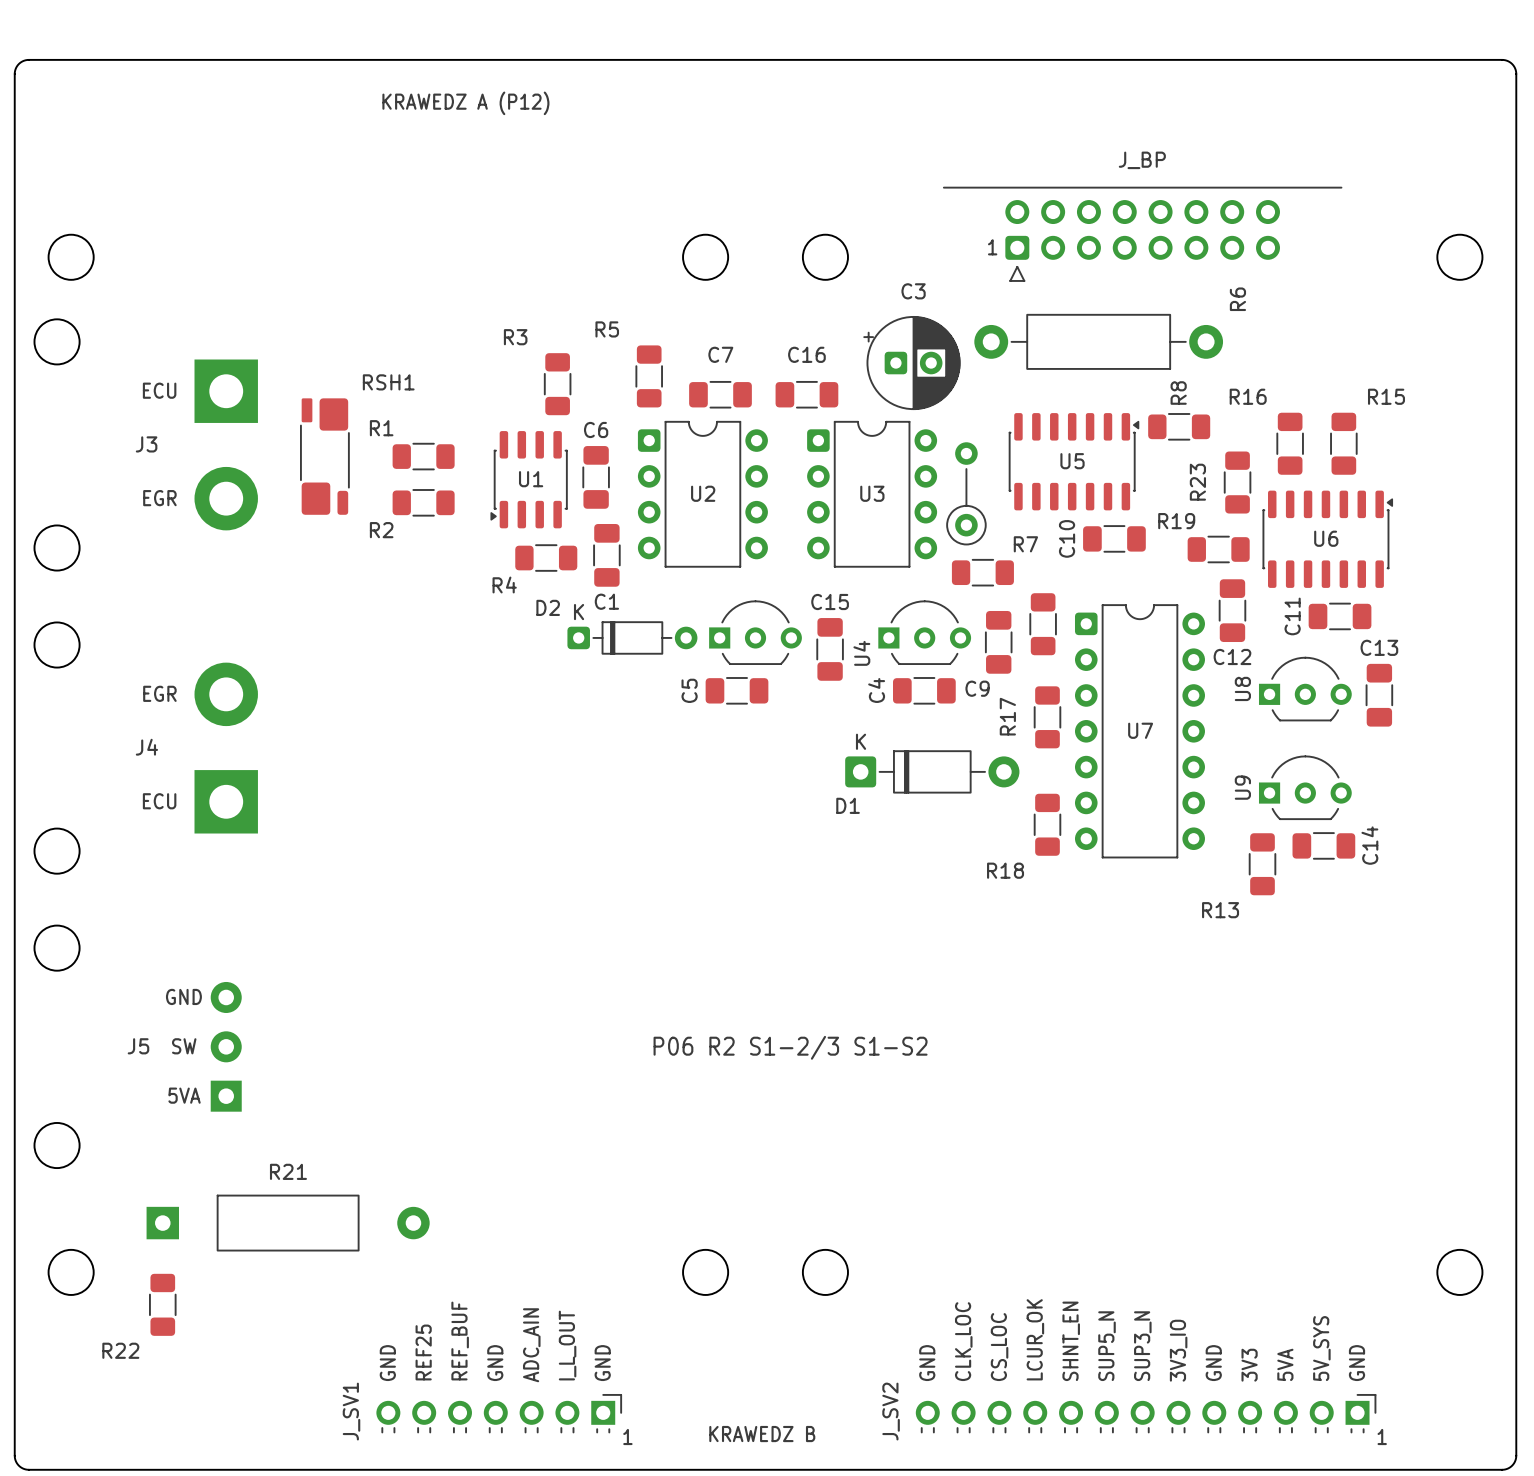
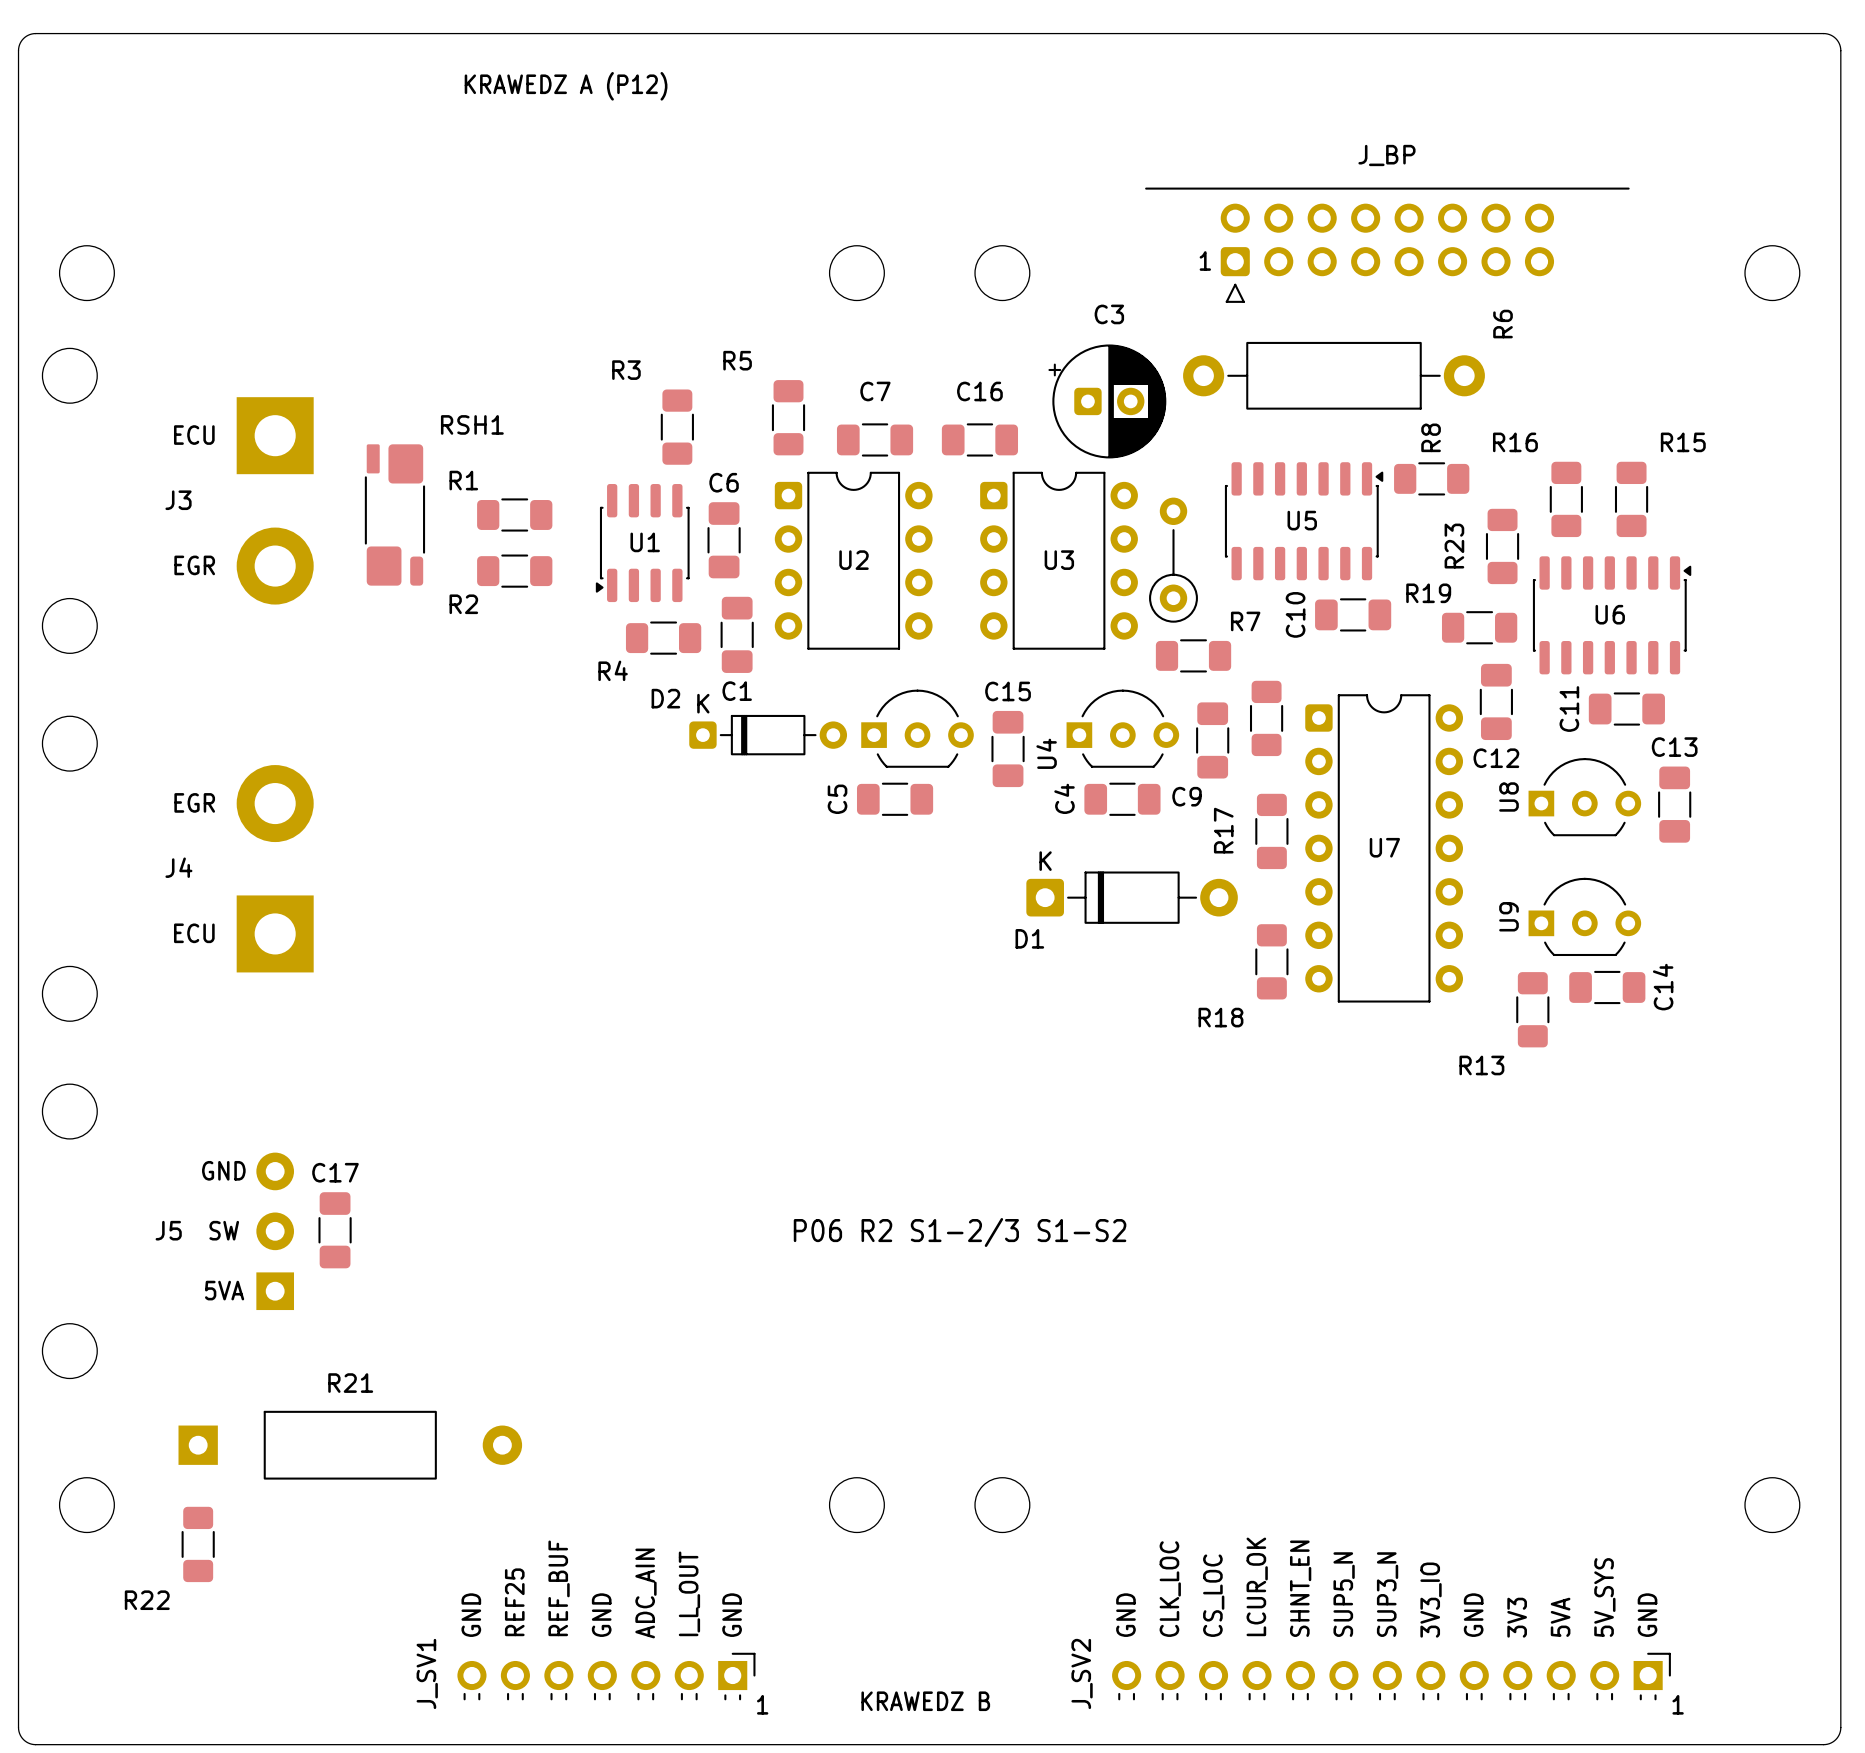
C17: none -> (335, 1230)

